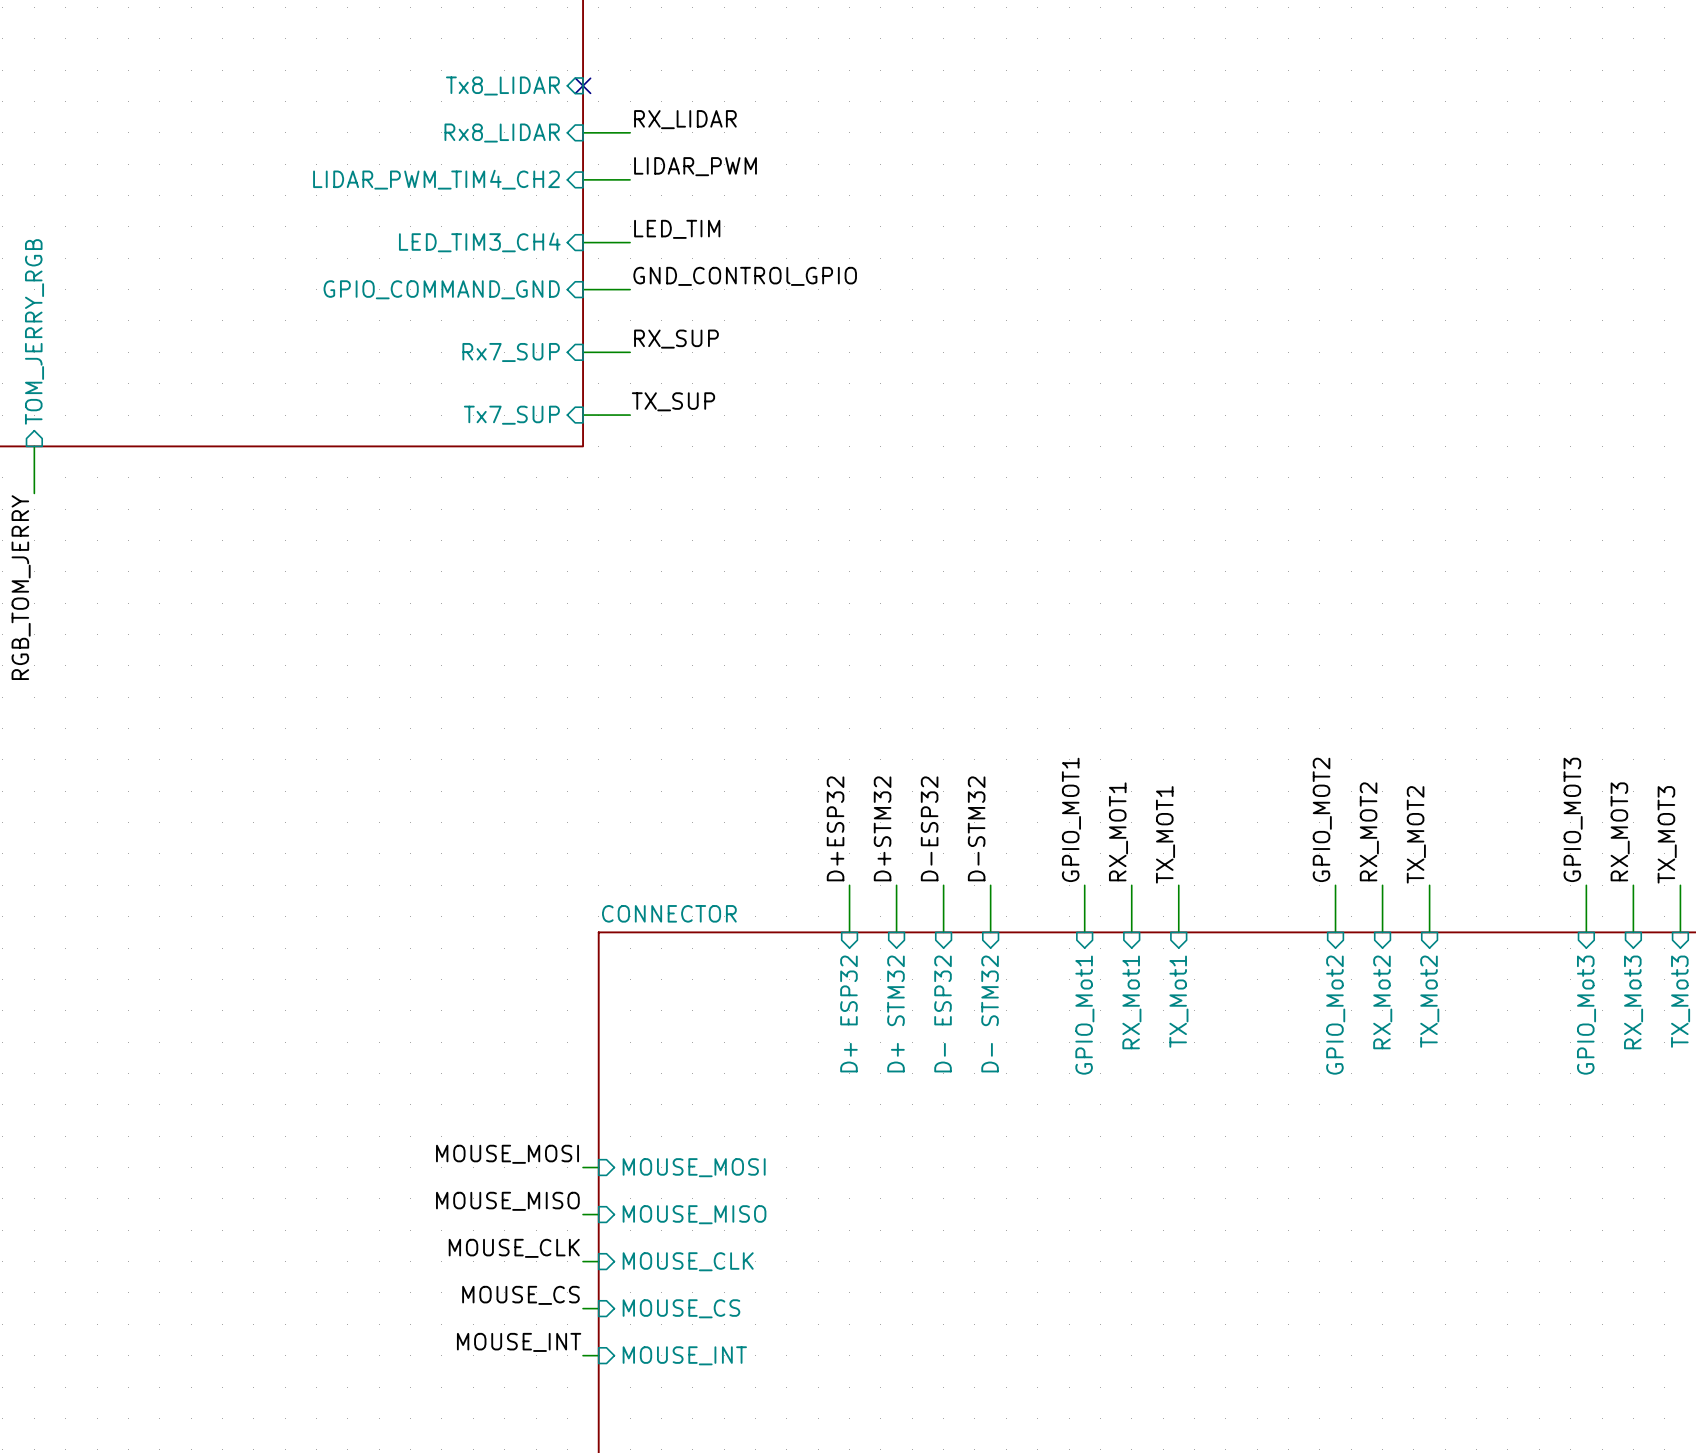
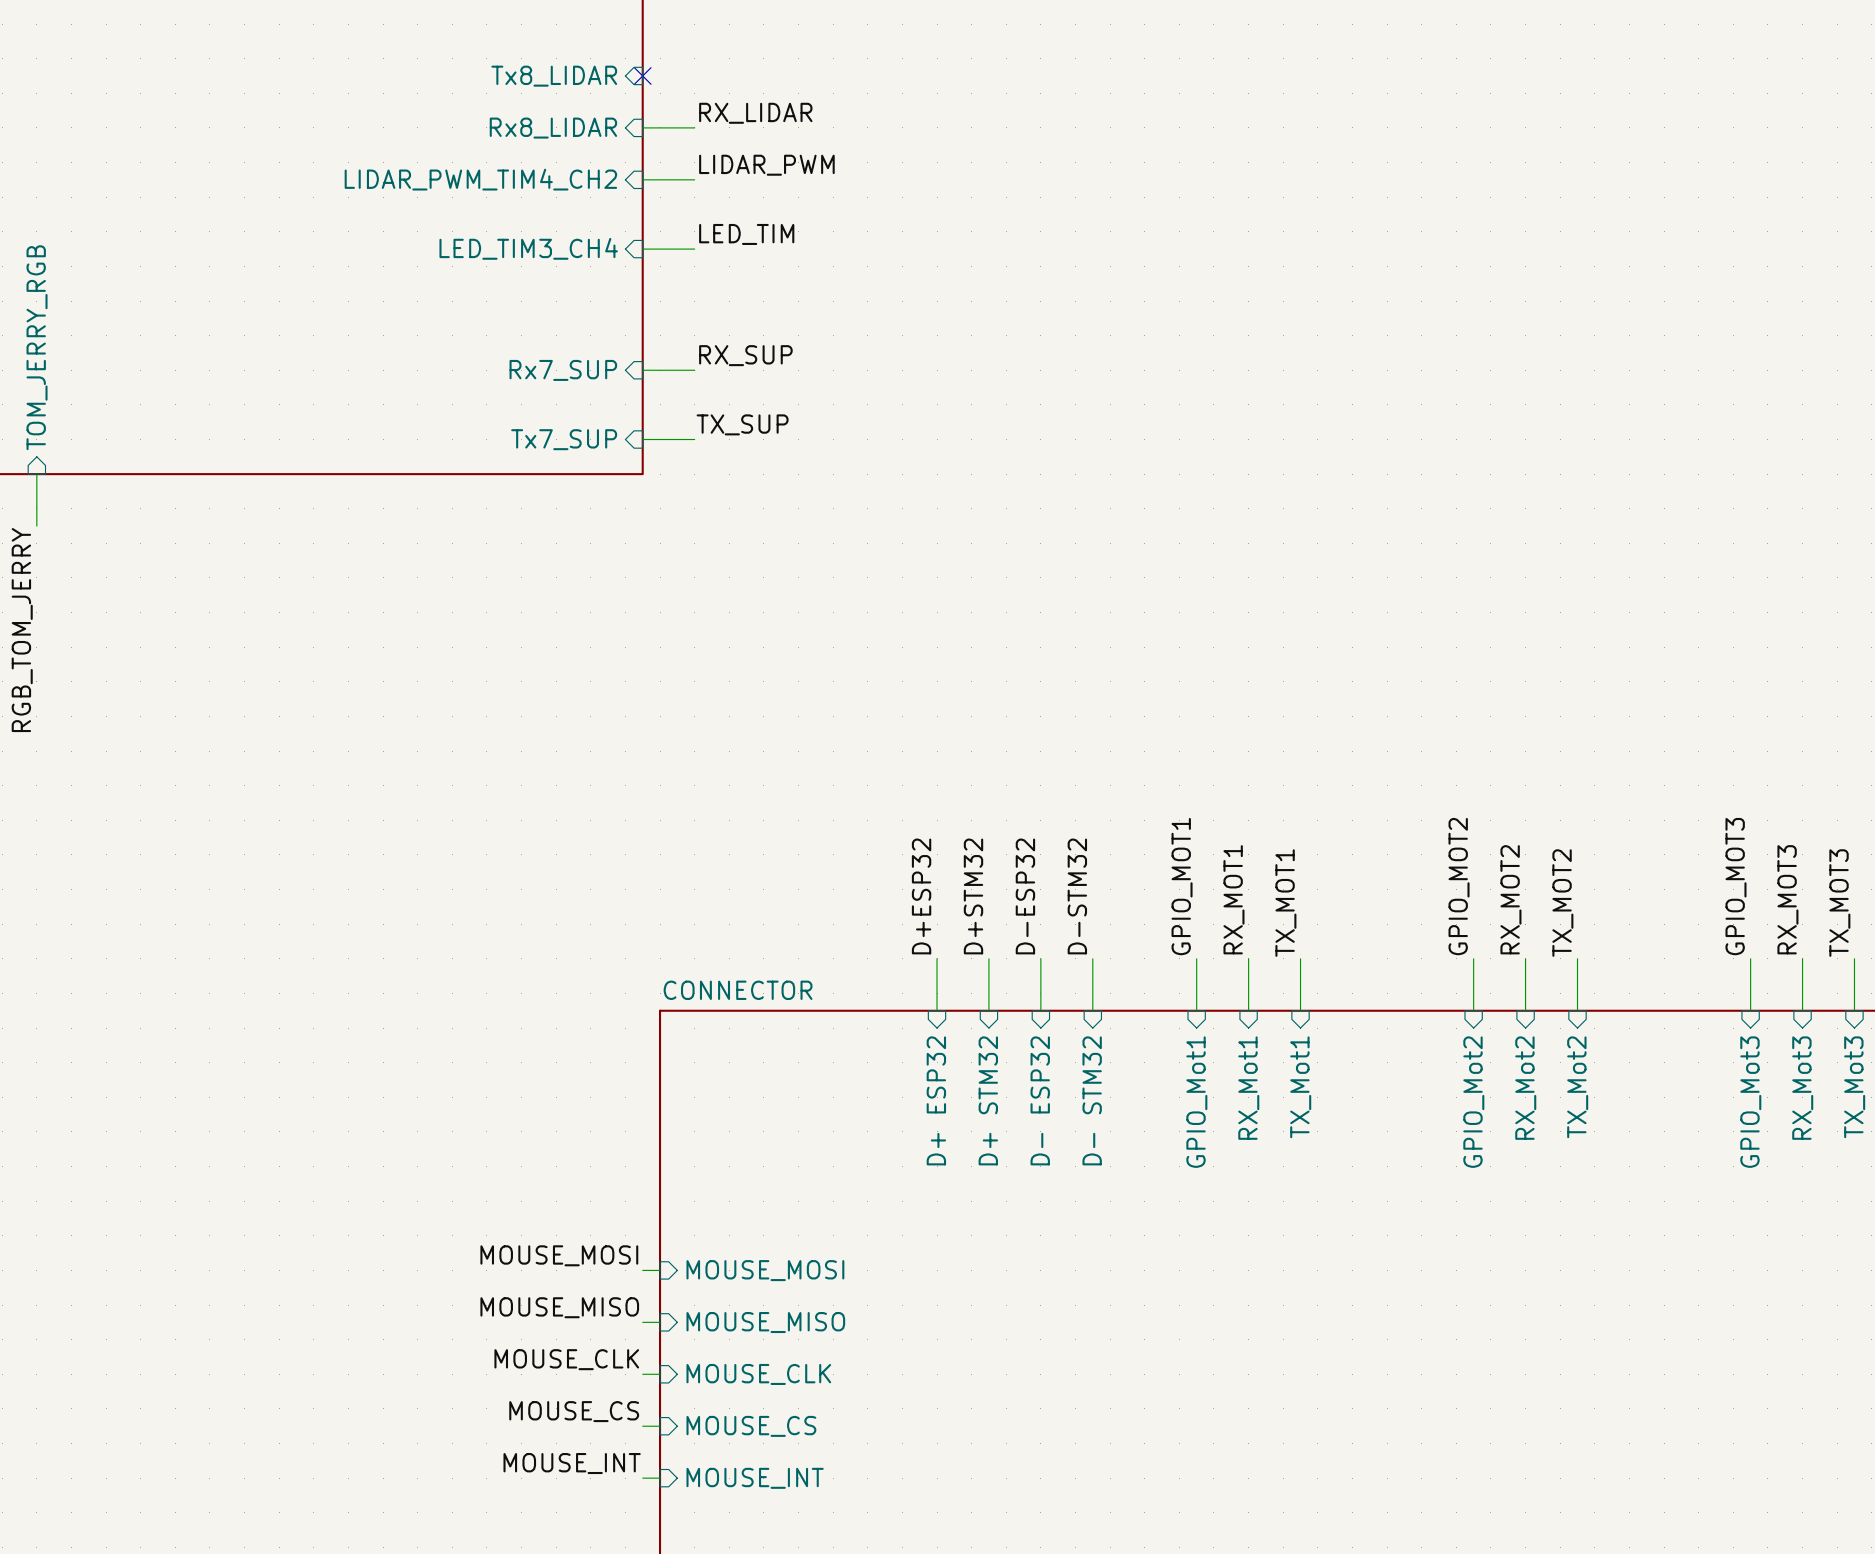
label: GND_CONTROl_GPIO (745, 276) -> none
sheet pin: GPIO_COMMAND_GND (441, 289) -> none
wire: (583, 289) (630, 289) -> none

